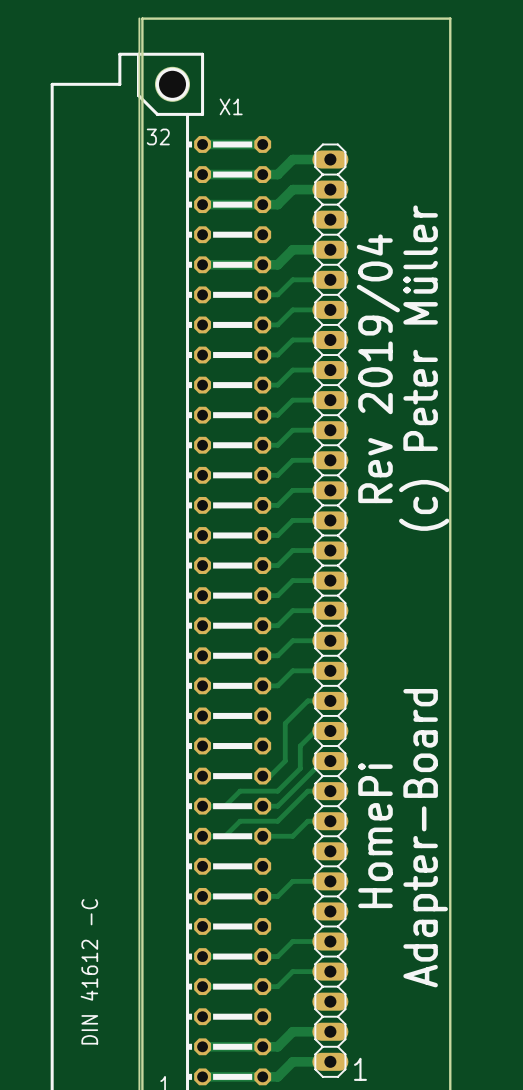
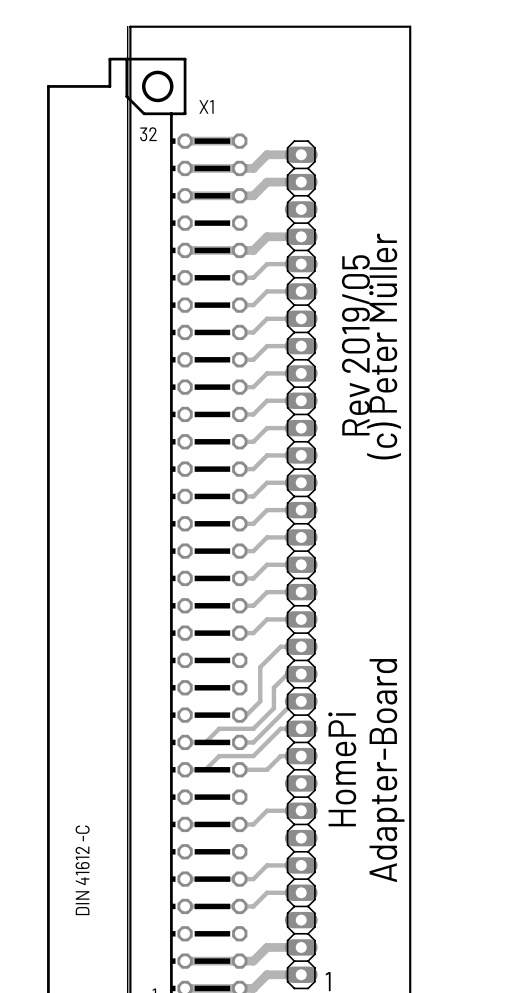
text: Rev 2019/04 (378, 368) -> Rev 2019/05 (355, 345)

